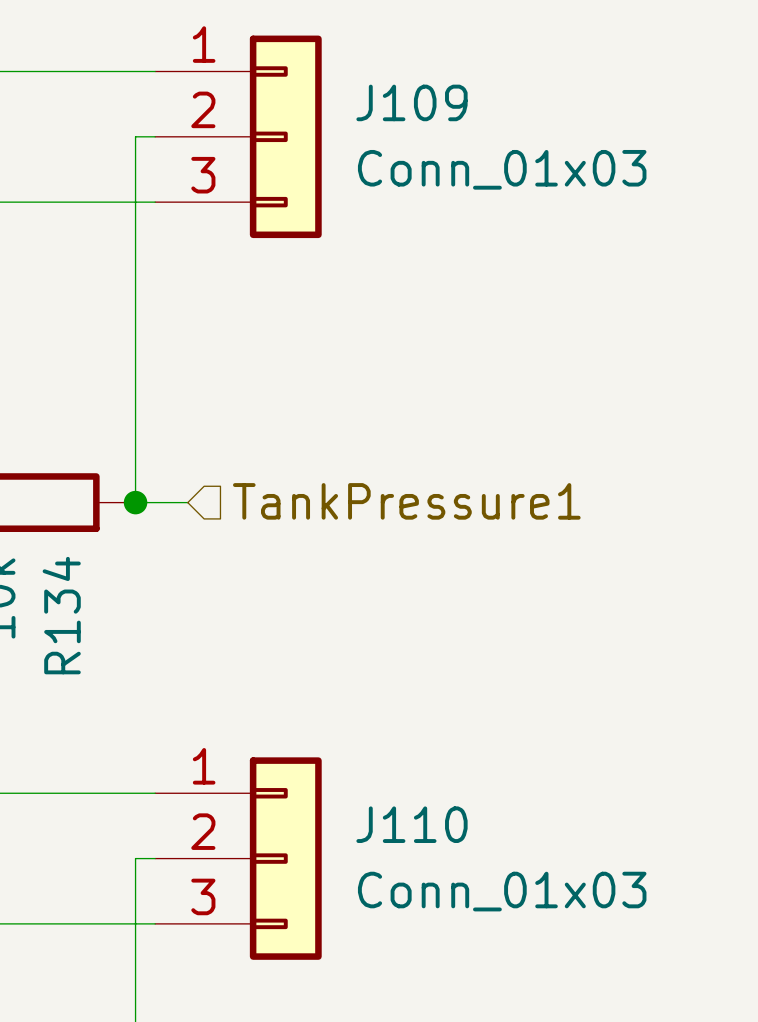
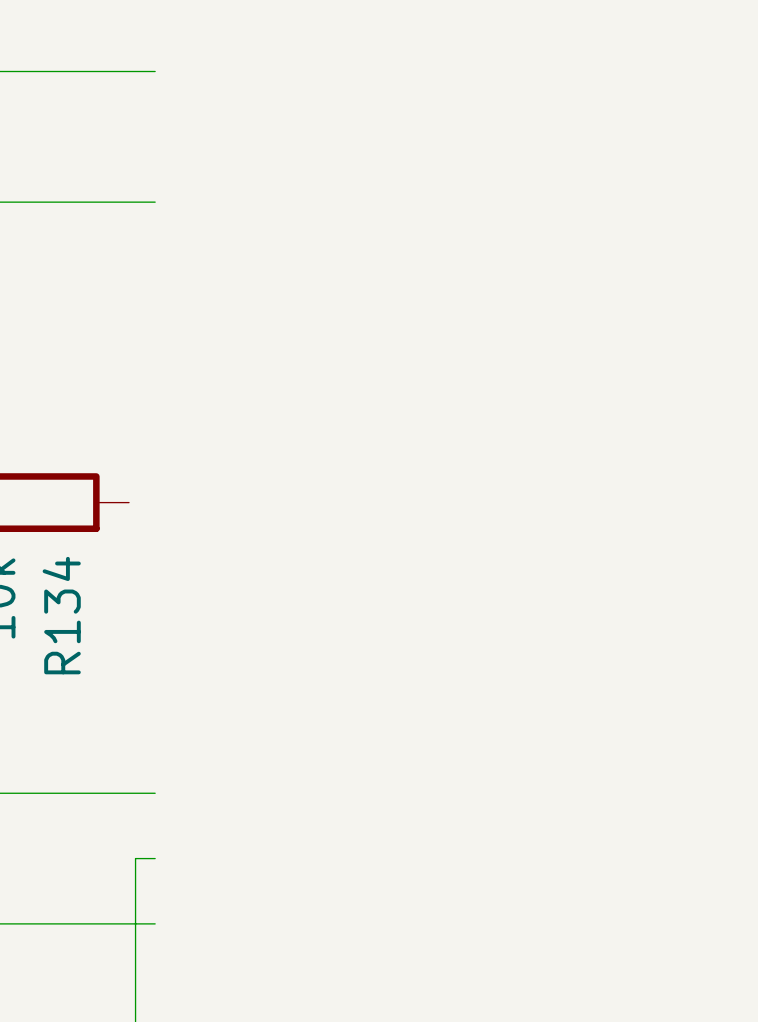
wire: (155, 136) (135, 136) (135, 502) -> none
J109: Conn_01x03 (238, 136) -> none
hierarchical label: TankPressure1 (406, 501) -> none
wire: (129, 502) (187, 502) -> none
junction: (135, 502) -> none
J110: Conn_01x03 (238, 858) -> none

